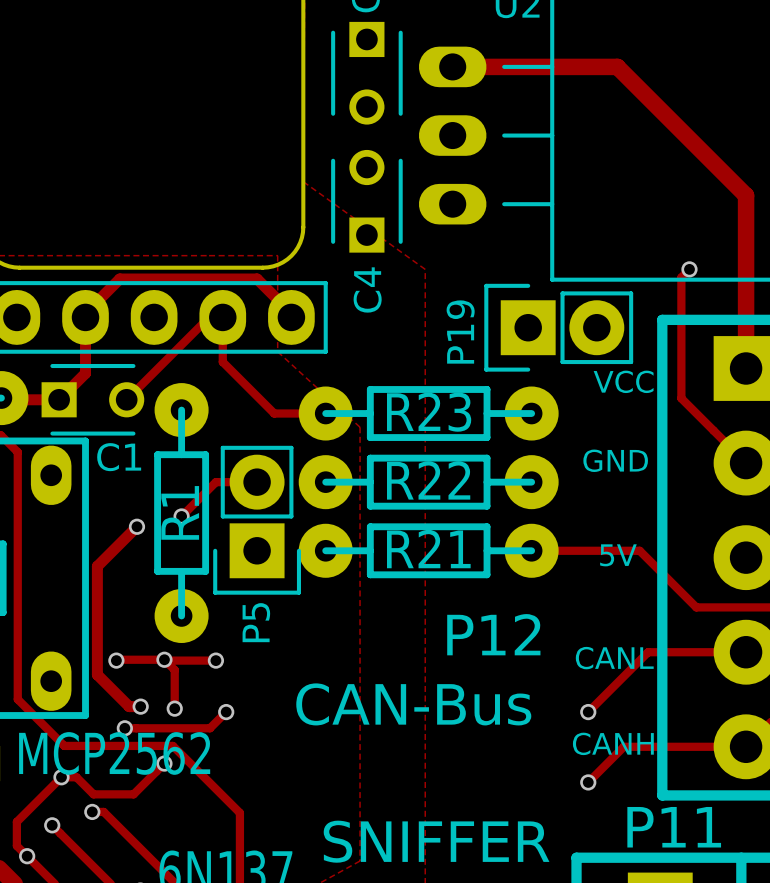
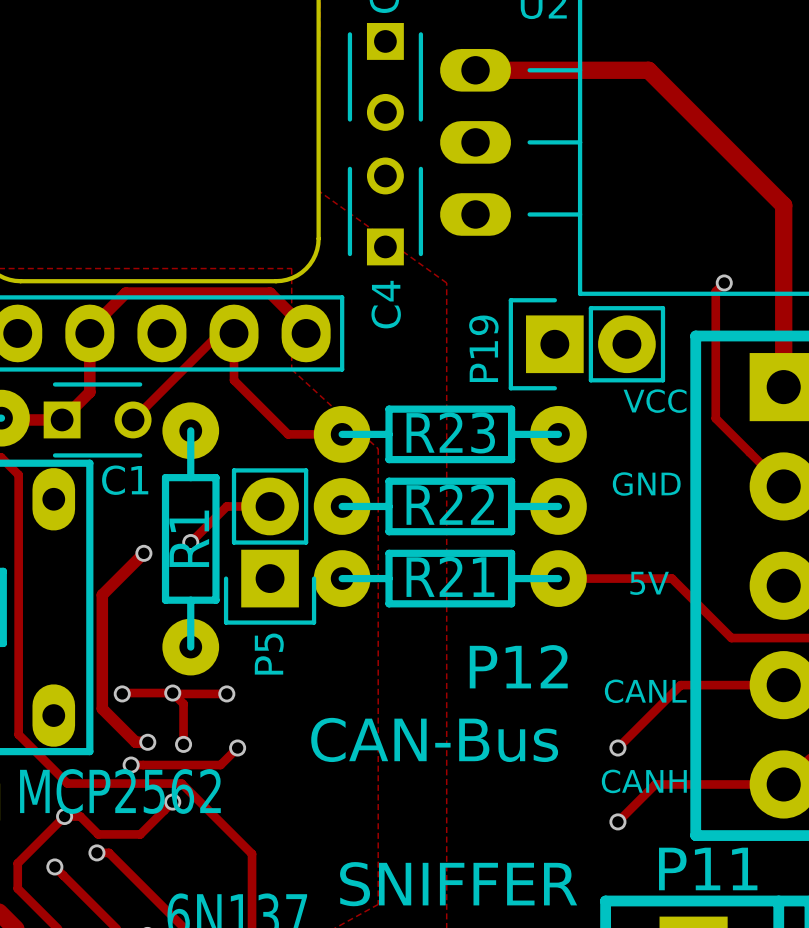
via: (27, 856) -> none

